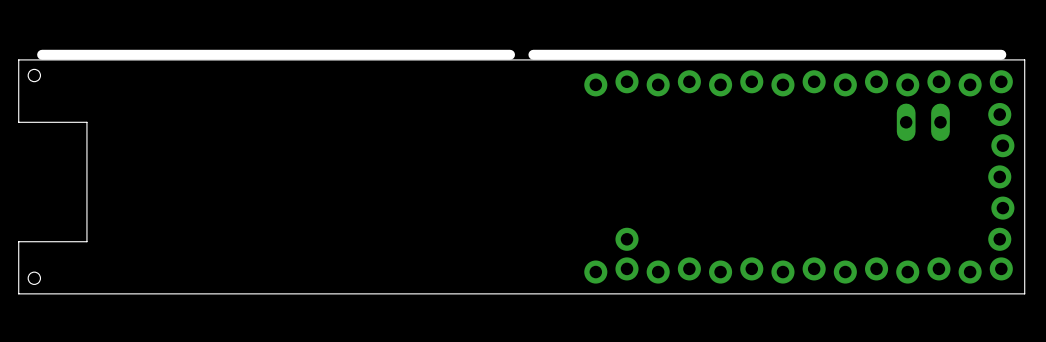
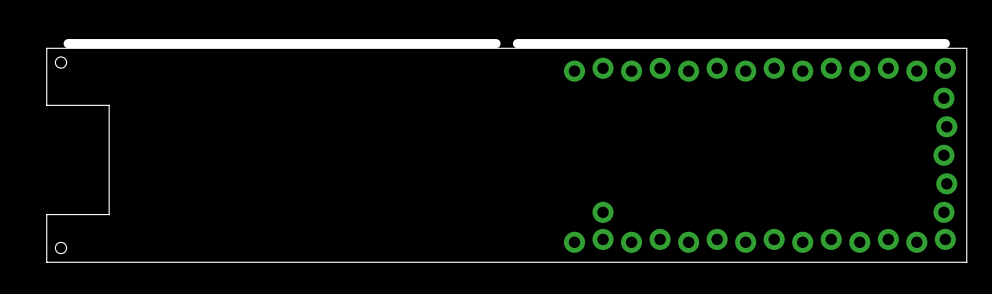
part: (923, 122) -> none

